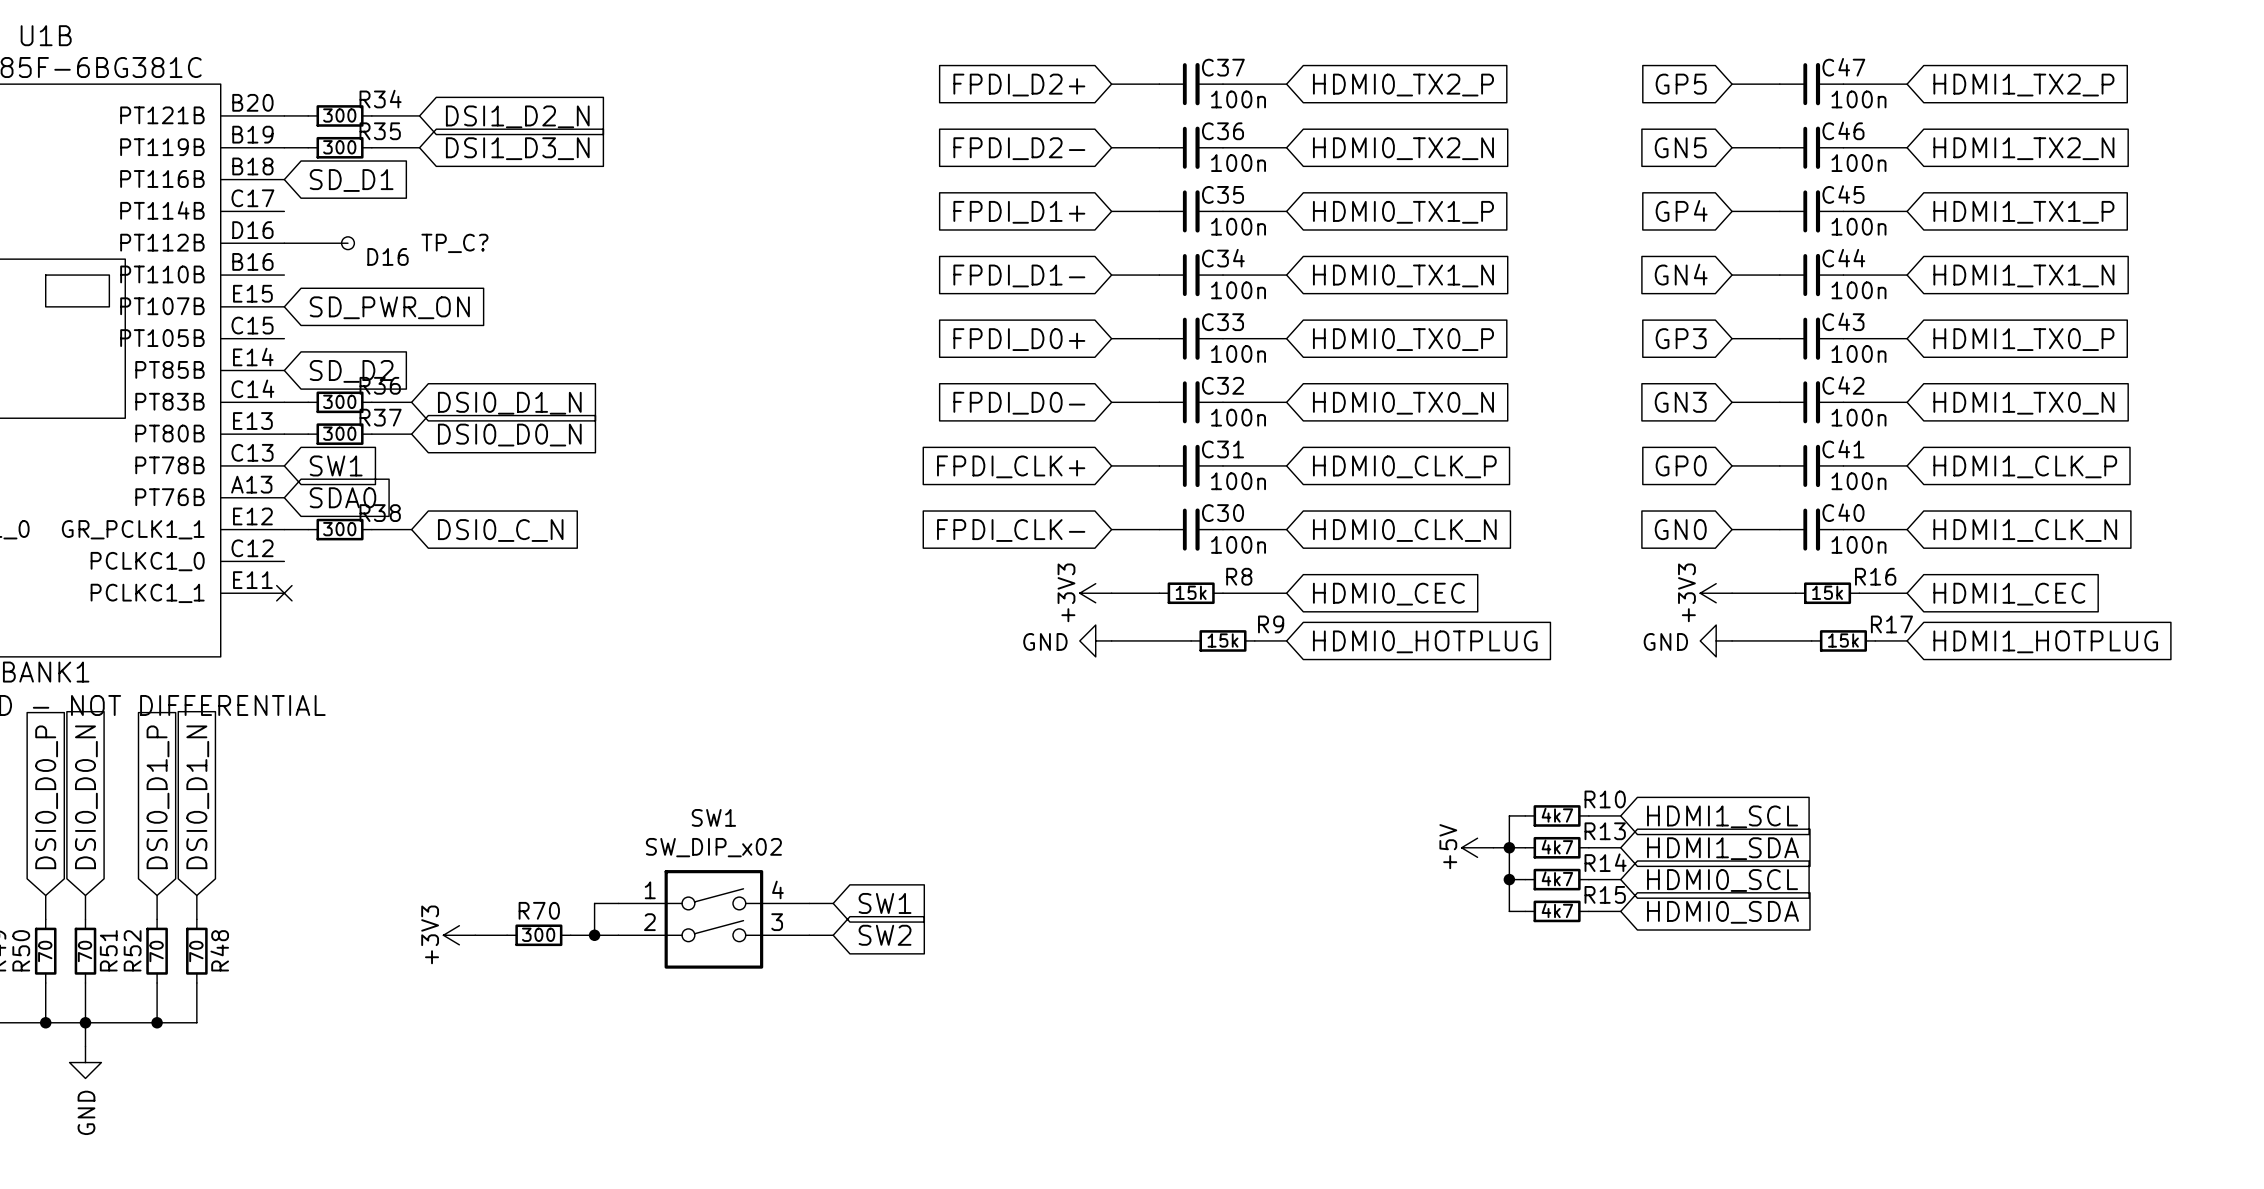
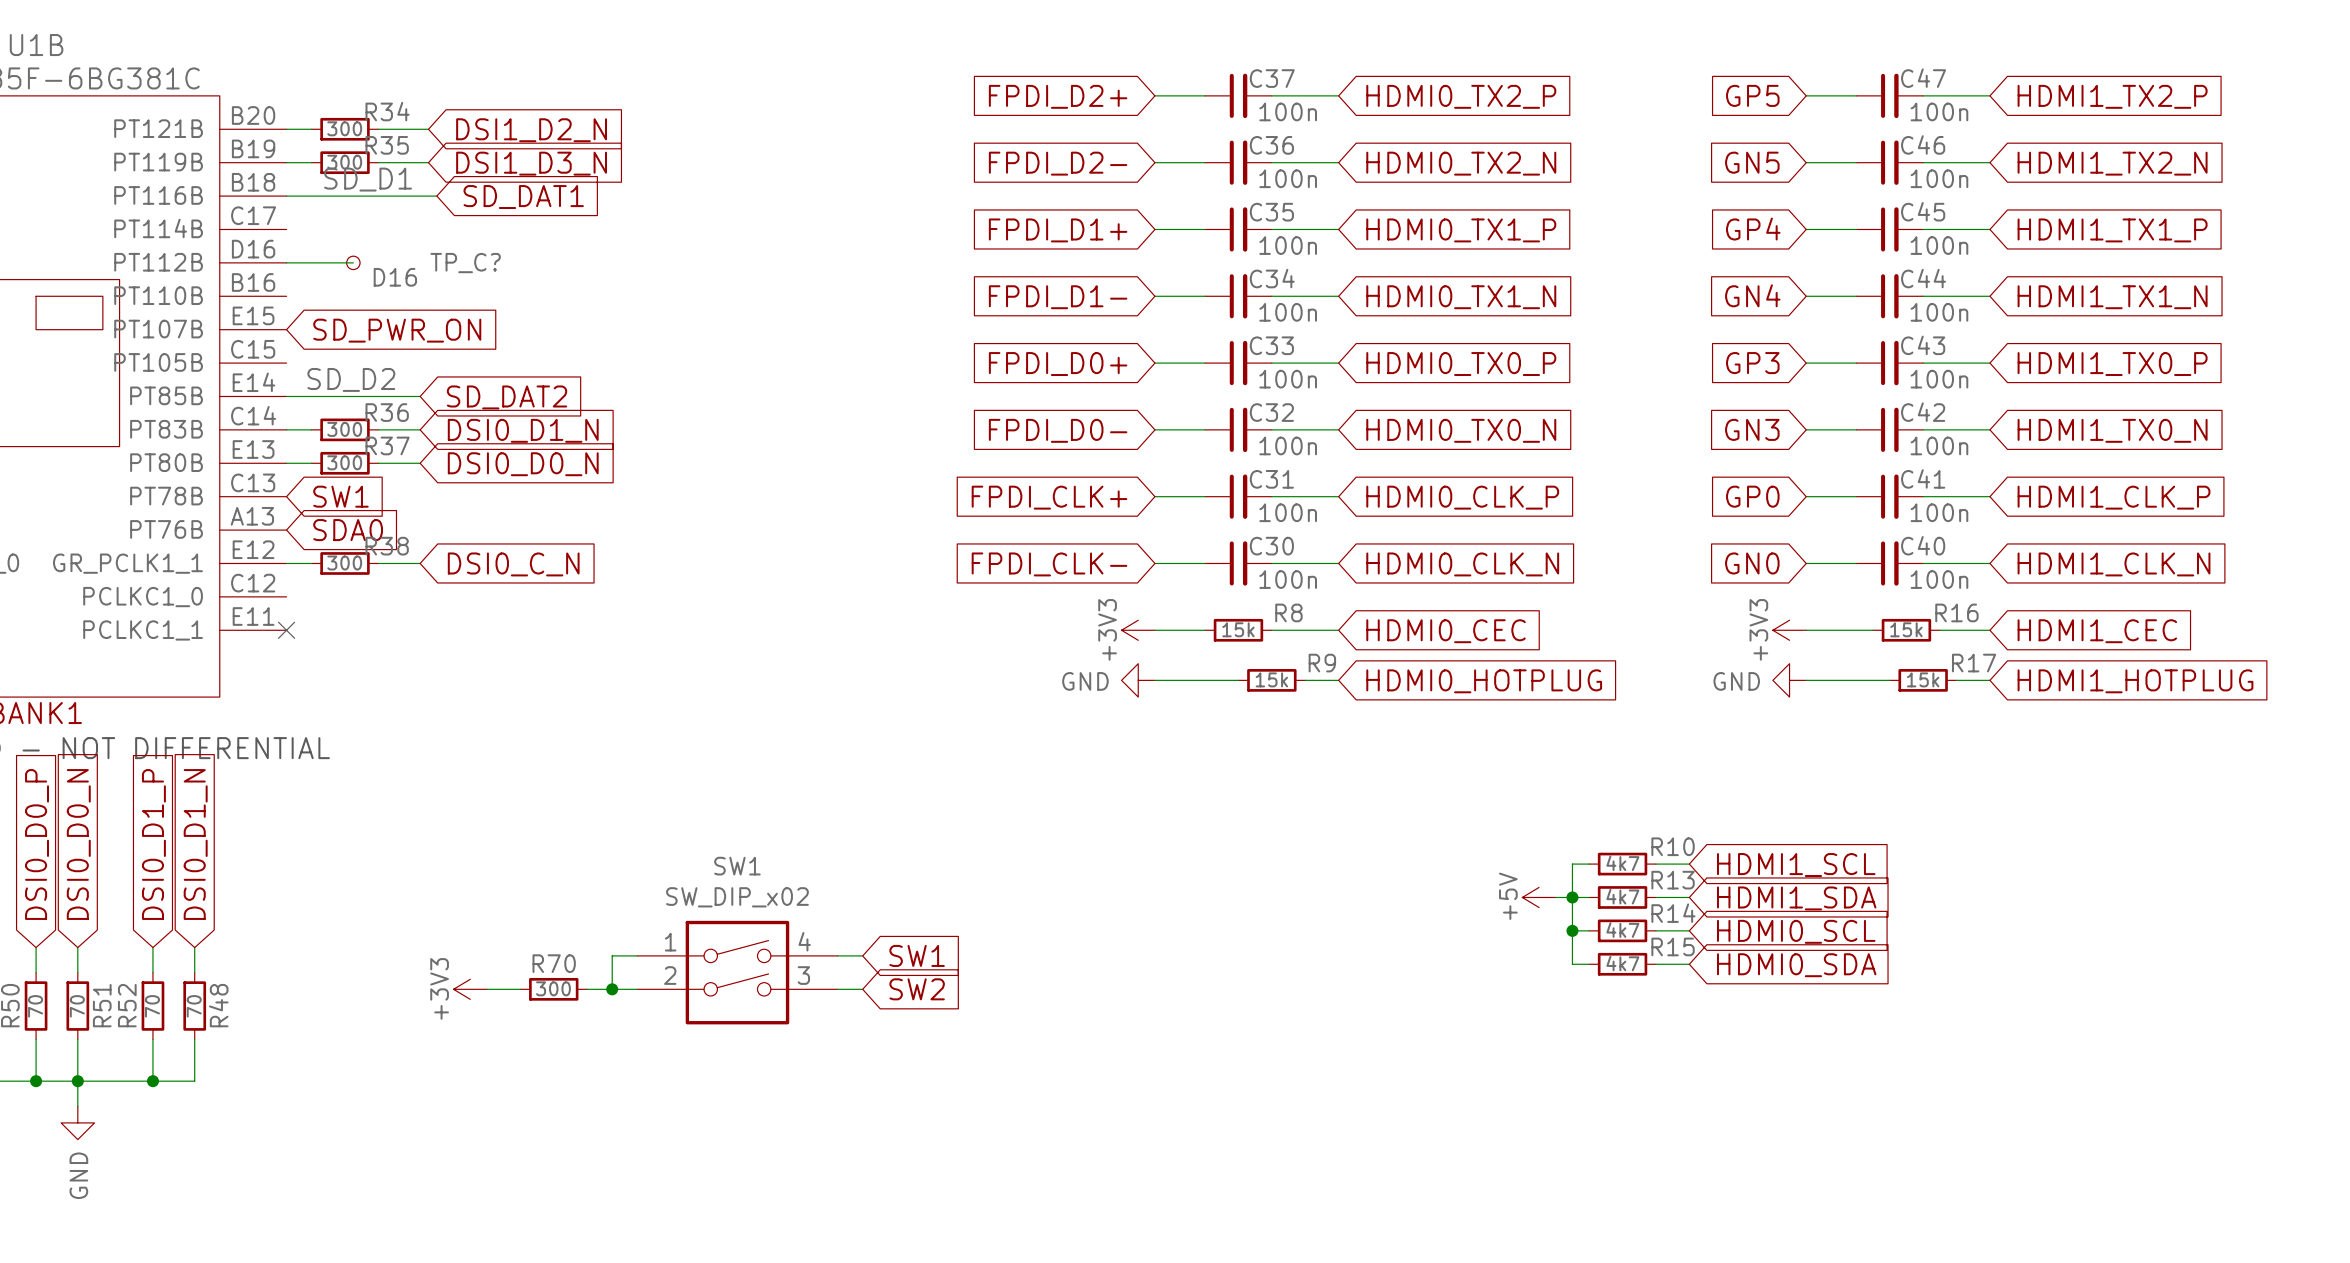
label: none -> SD_D1 (368, 179)
wire: none -> (286, 196) (436, 196)
global label: SD_D1 (351, 180) -> SD_DAT1 (523, 197)
label: none -> SD_D2 (351, 379)
wire: none -> (286, 396) (420, 396)
global label: SD_D2 (351, 371) -> SD_DAT2 (507, 397)

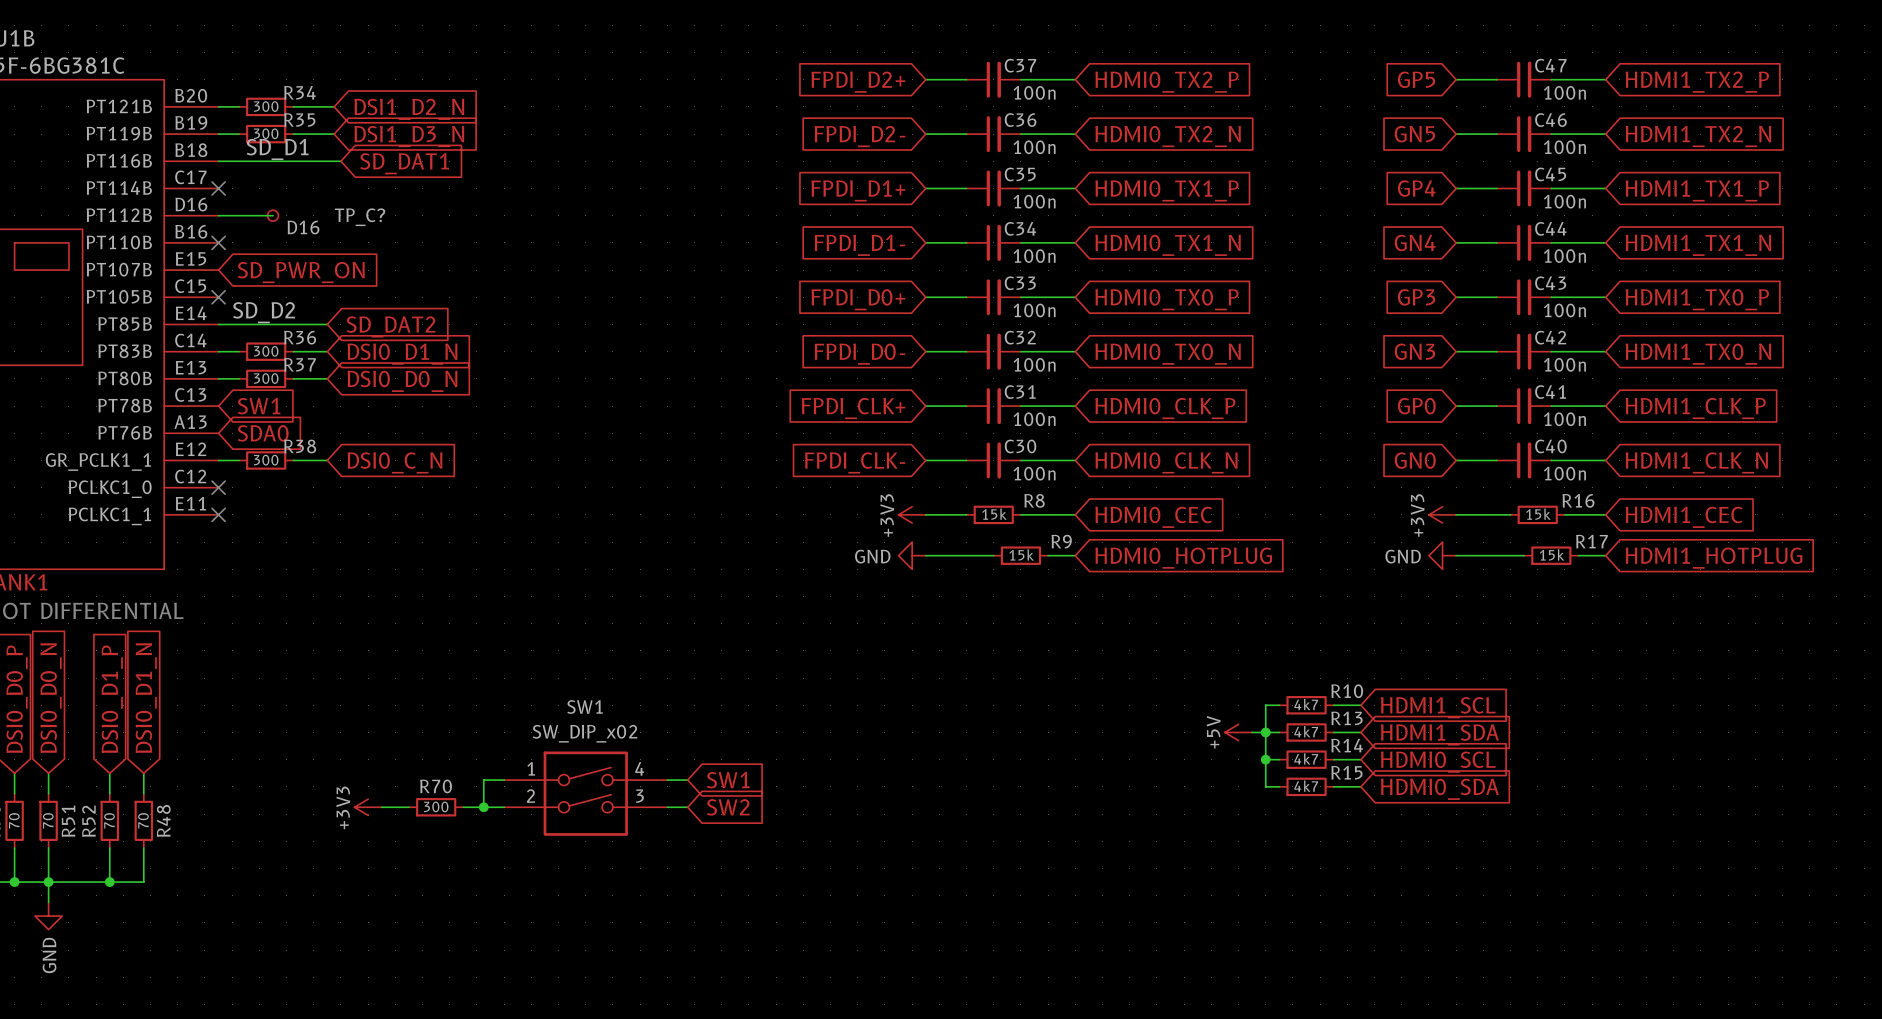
no-connect mark: none -> (218, 188)
no-connect mark: none -> (218, 242)
no-connect mark: none -> (218, 297)
no-connect mark: none -> (218, 487)

